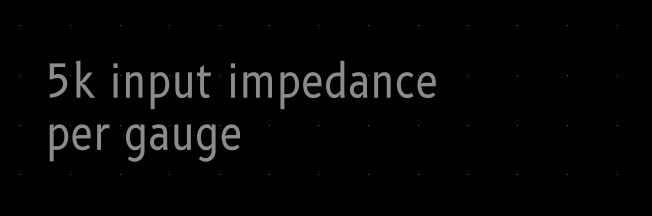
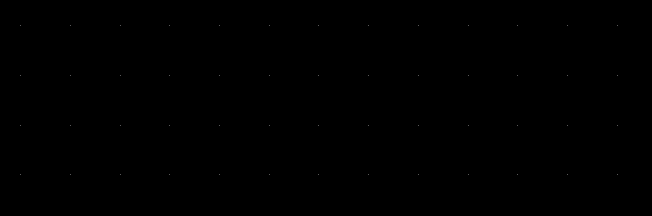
text: 5k input impedance (242, 84) -> none
text: per gauge (144, 143) -> none

